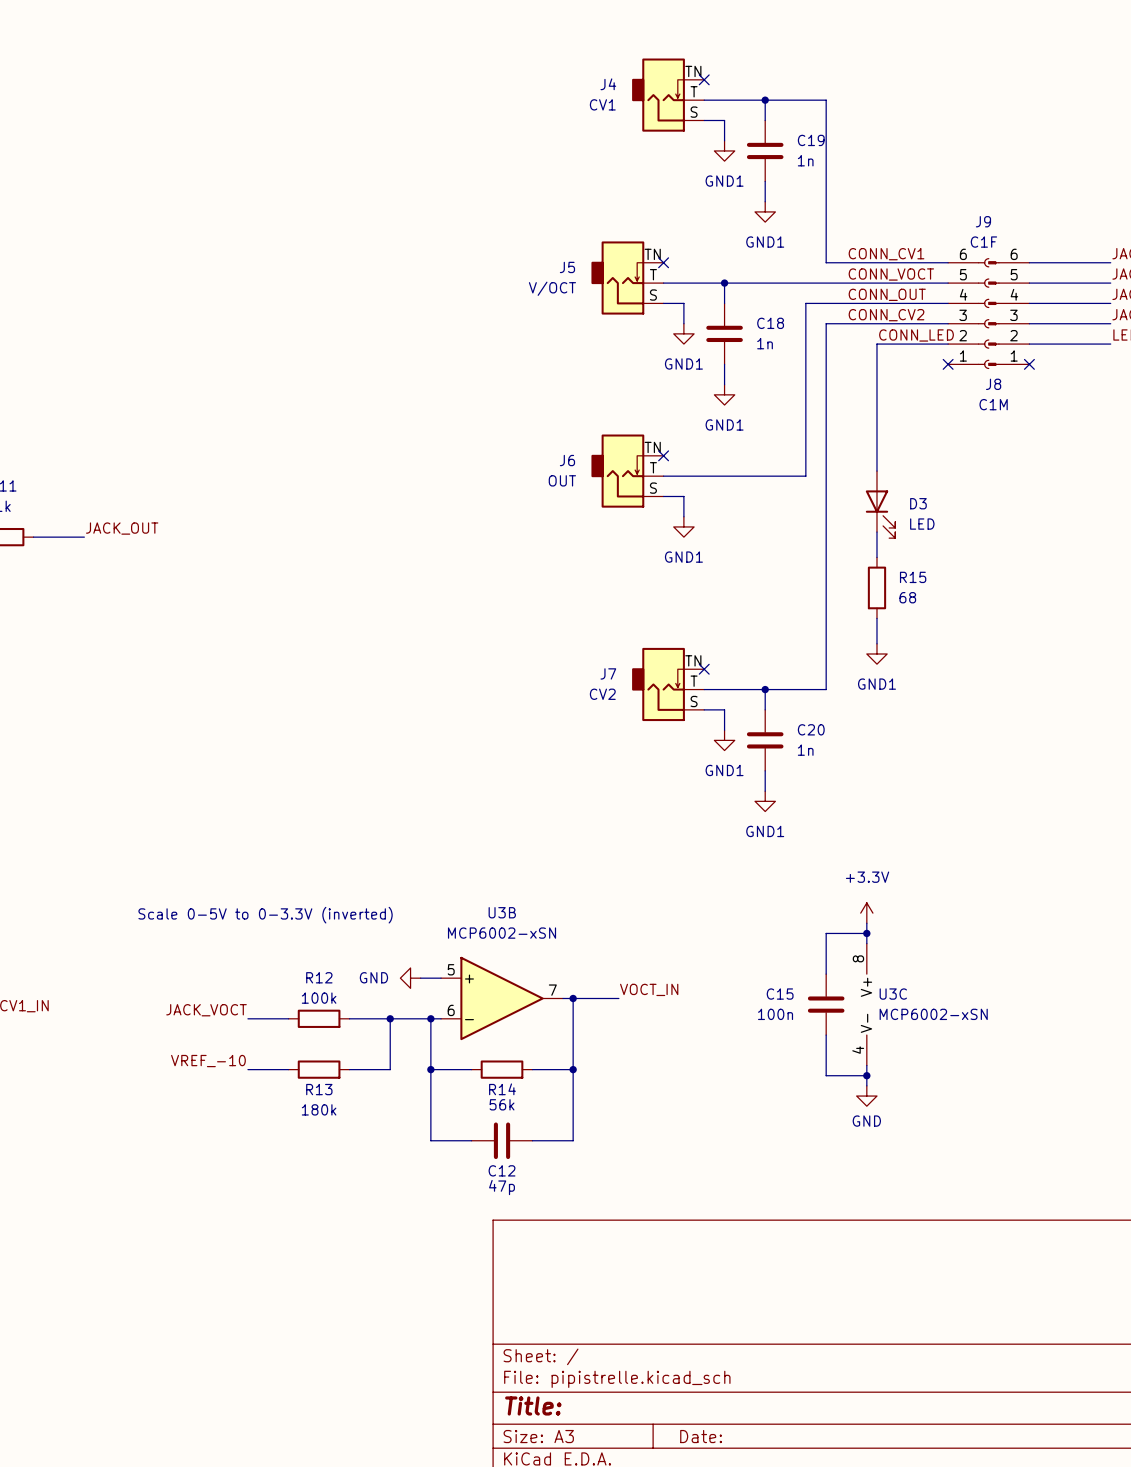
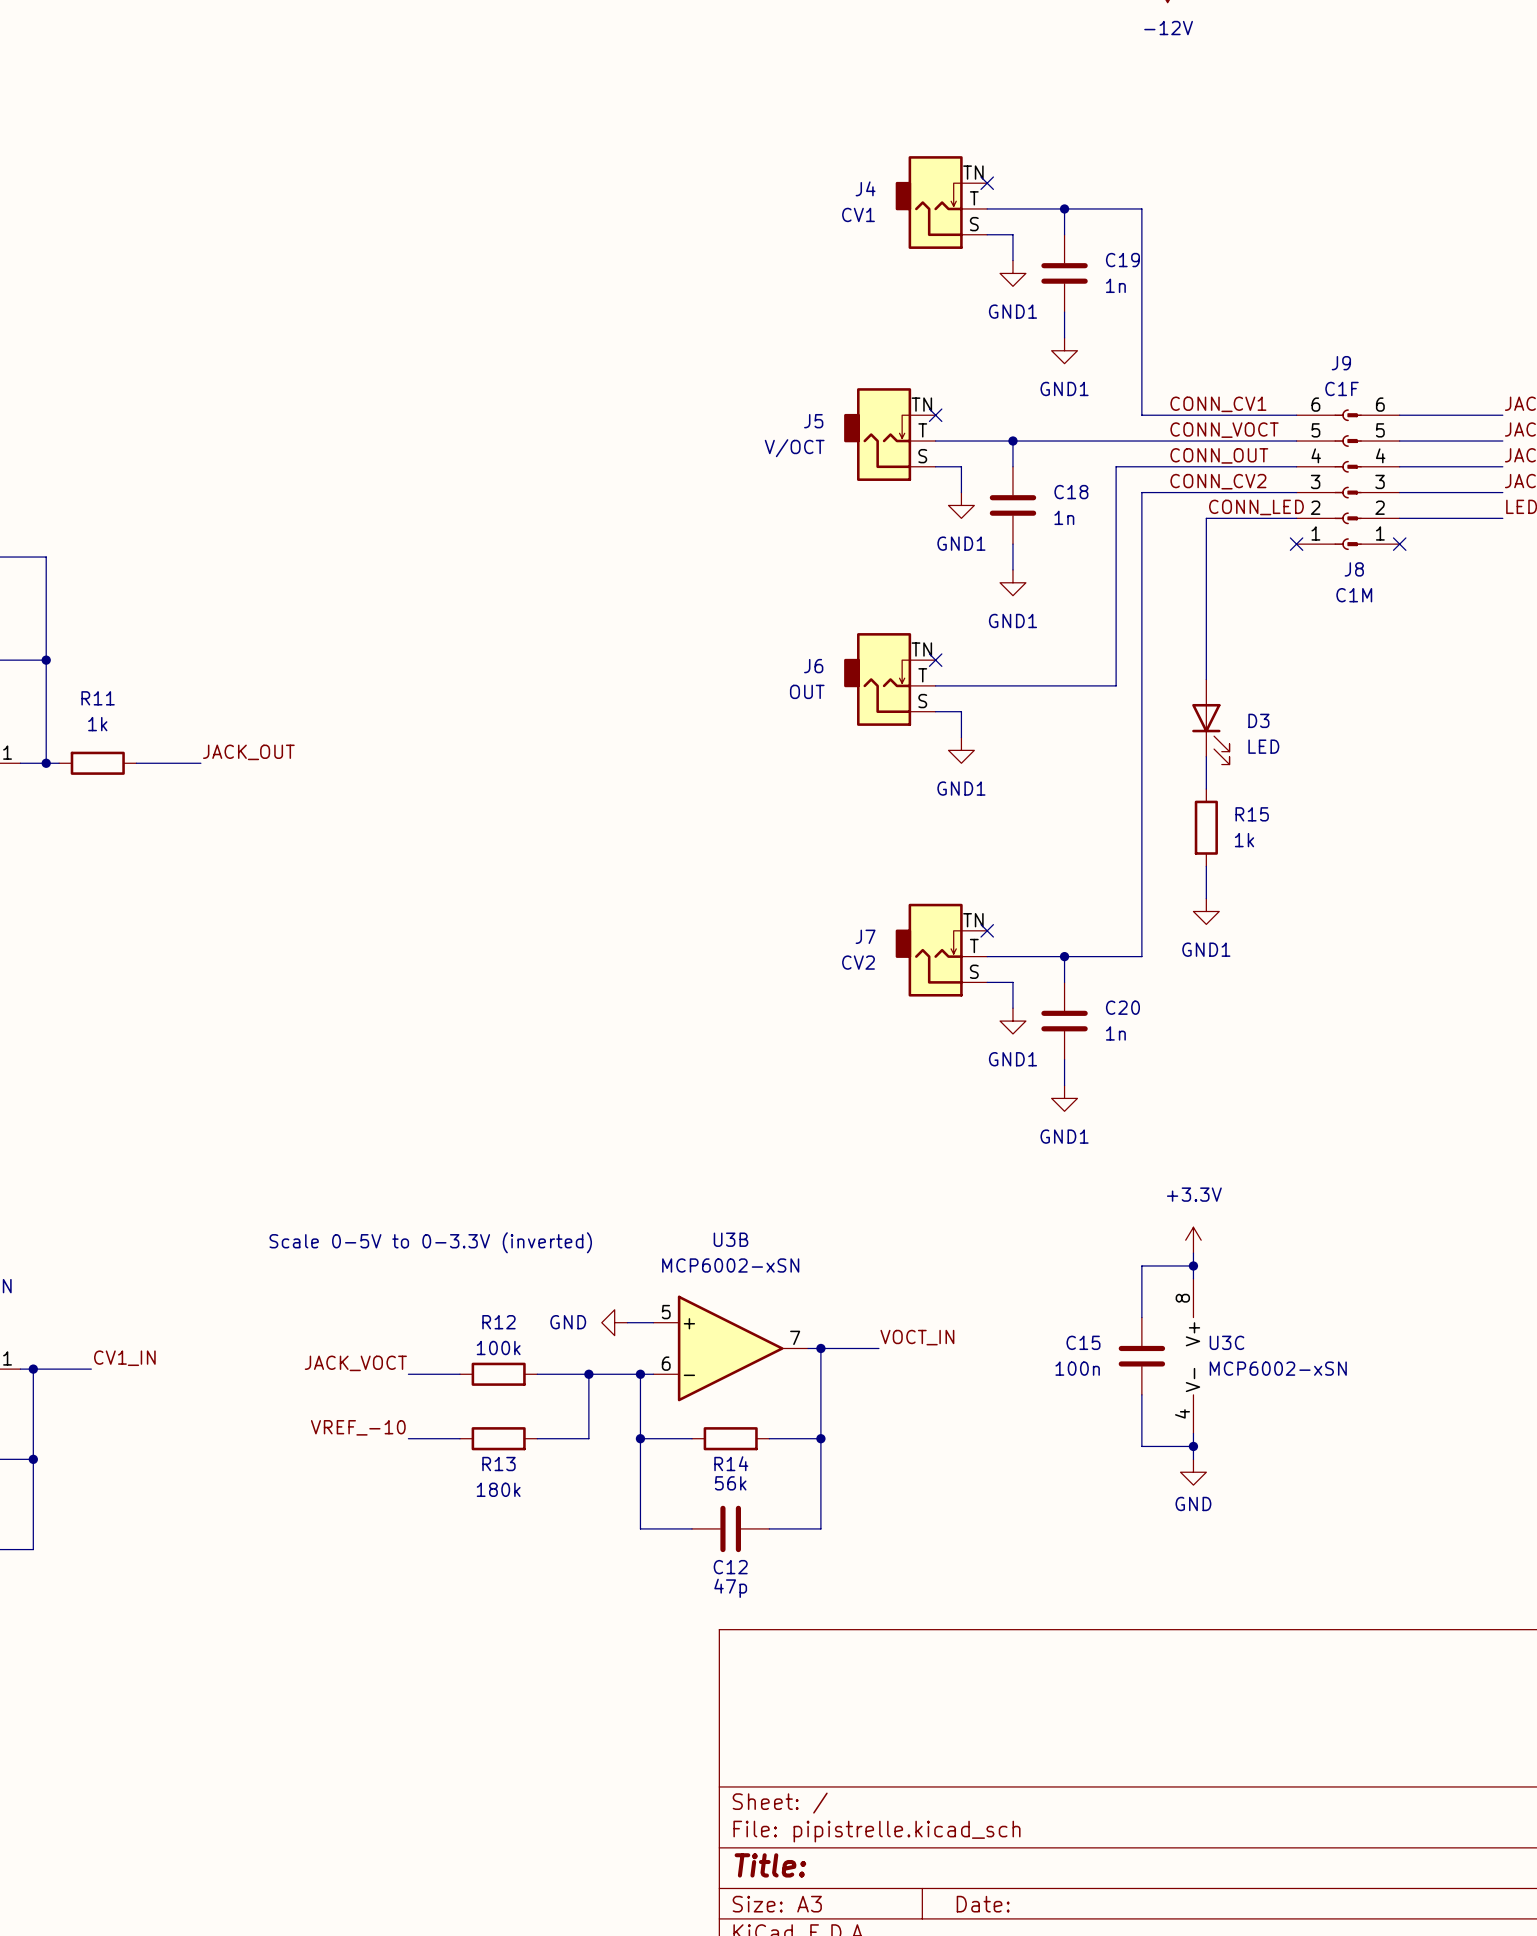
R15 value: 68 (907, 597) -> 1k (1244, 840)

